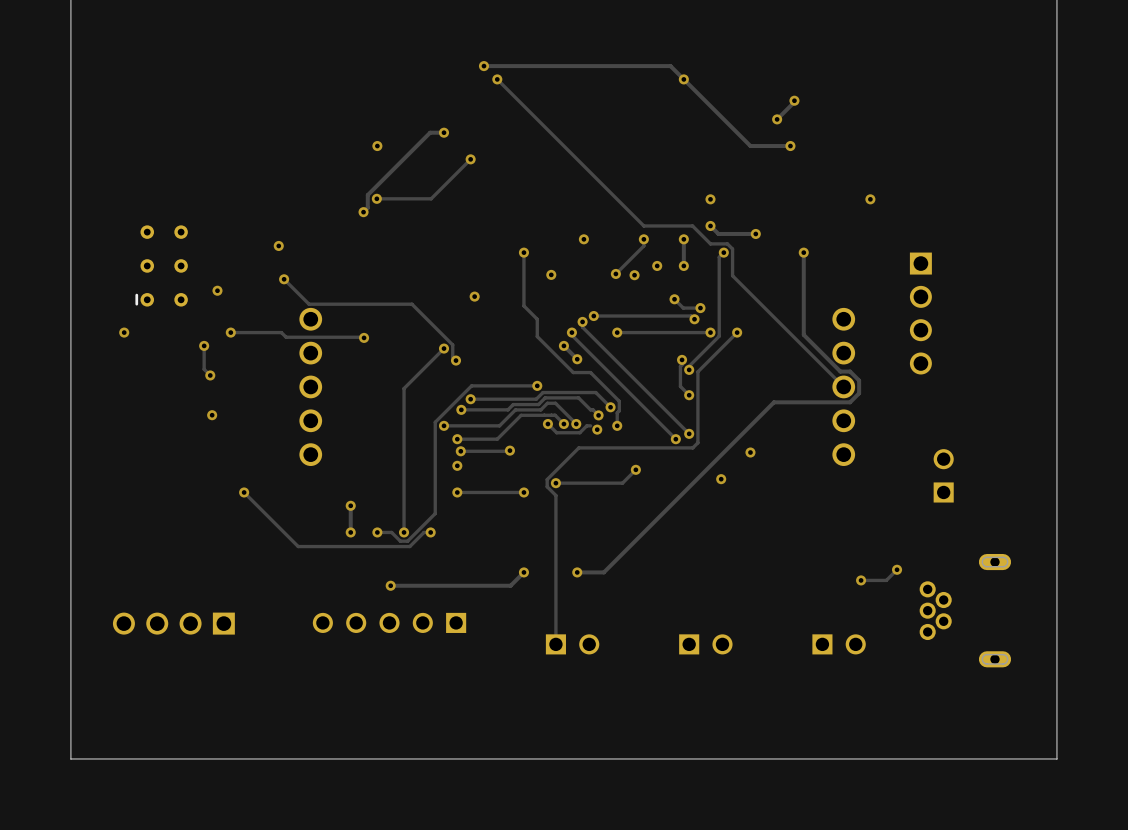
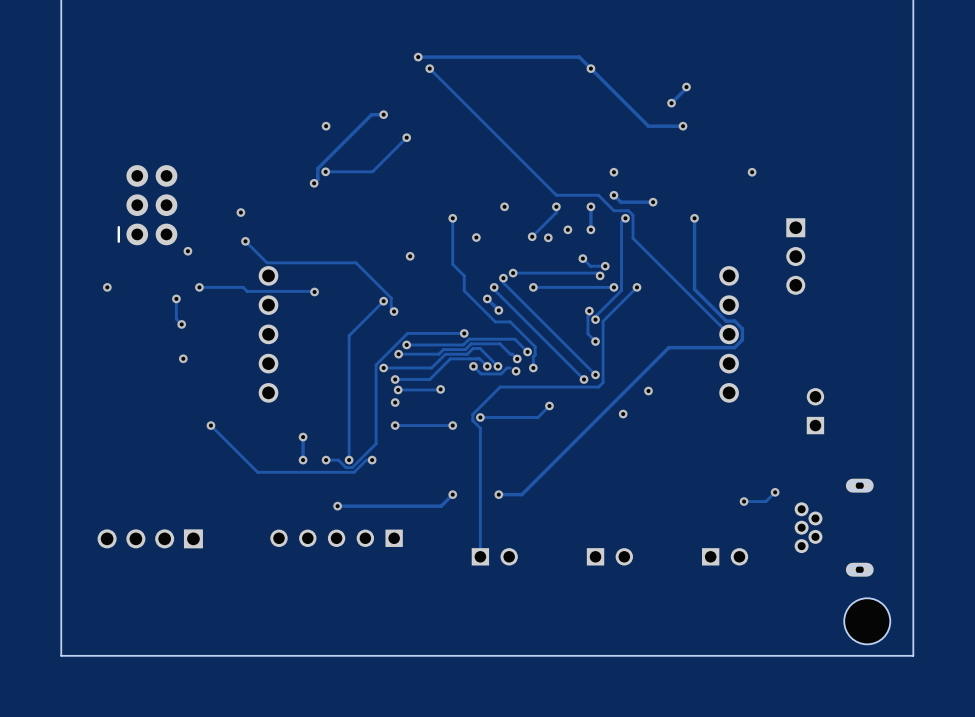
part: none -> (147, 205)
part: (161, 265) -> none
part: (920, 313) -> none
hole: none -> (867, 621)

